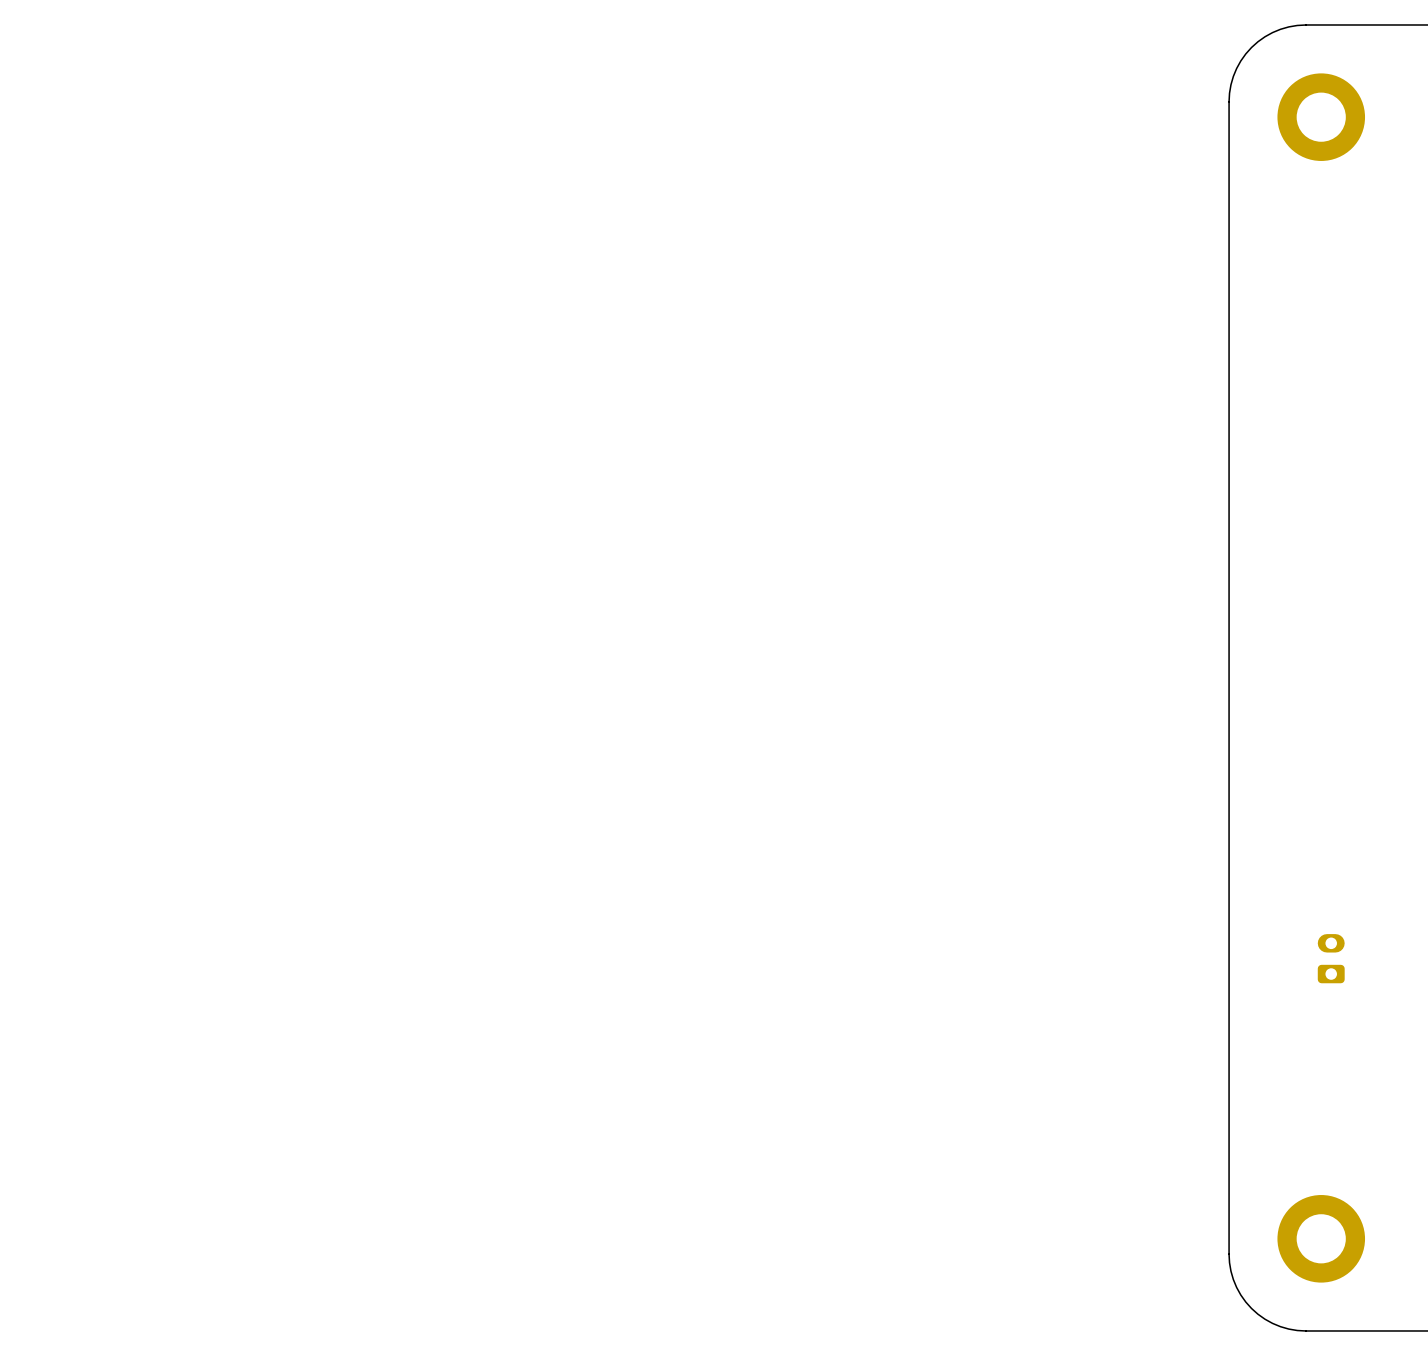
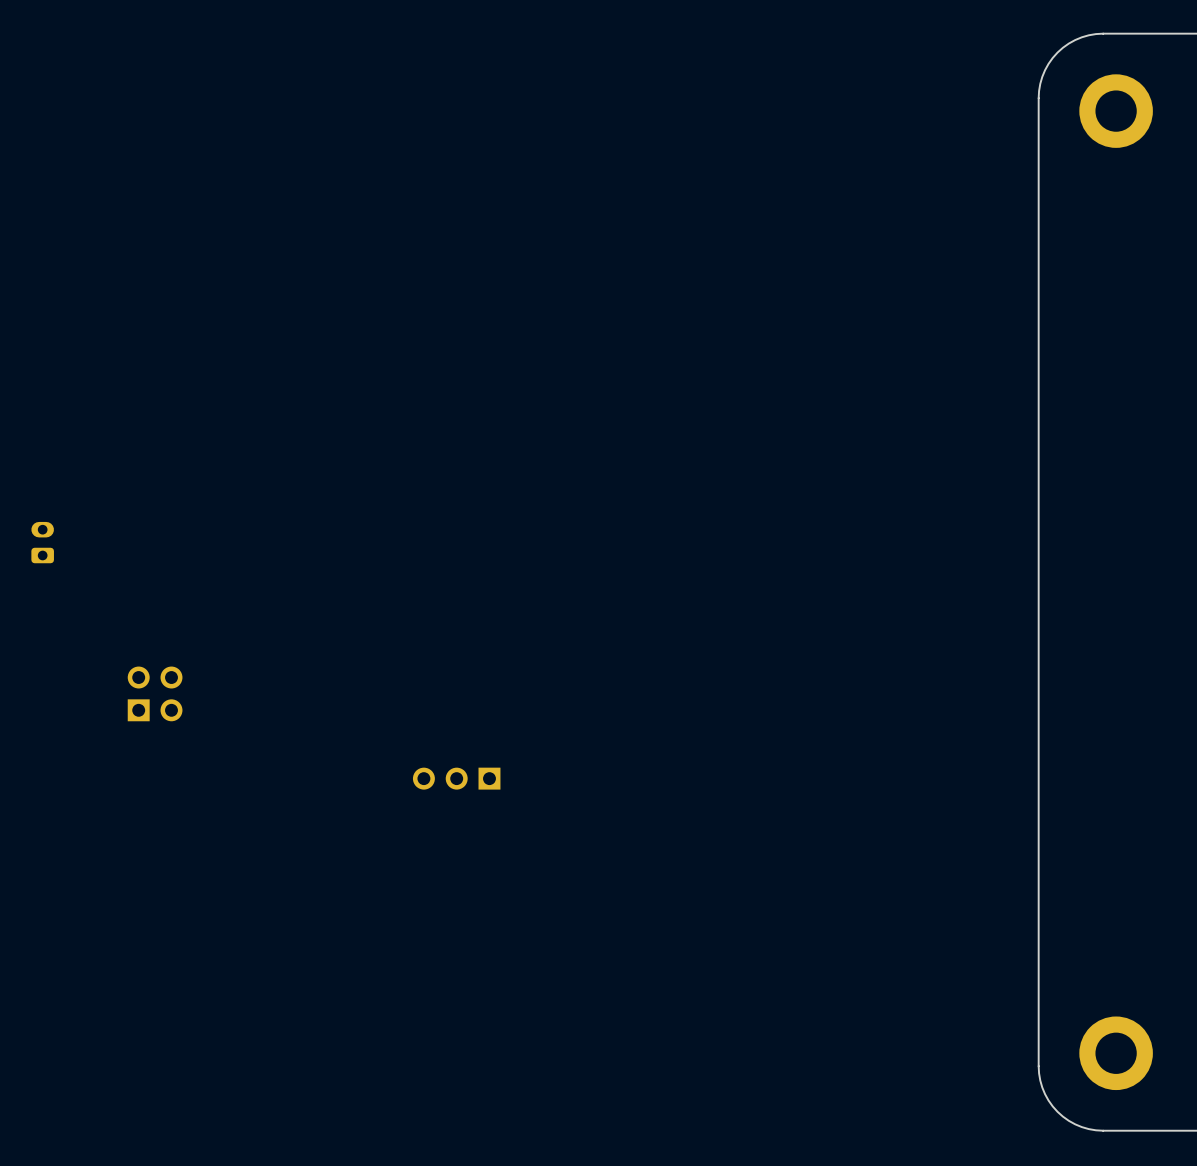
part: none -> (42, 542)
part: none -> (155, 693)
part: none -> (456, 778)
part: (1331, 958) -> none

